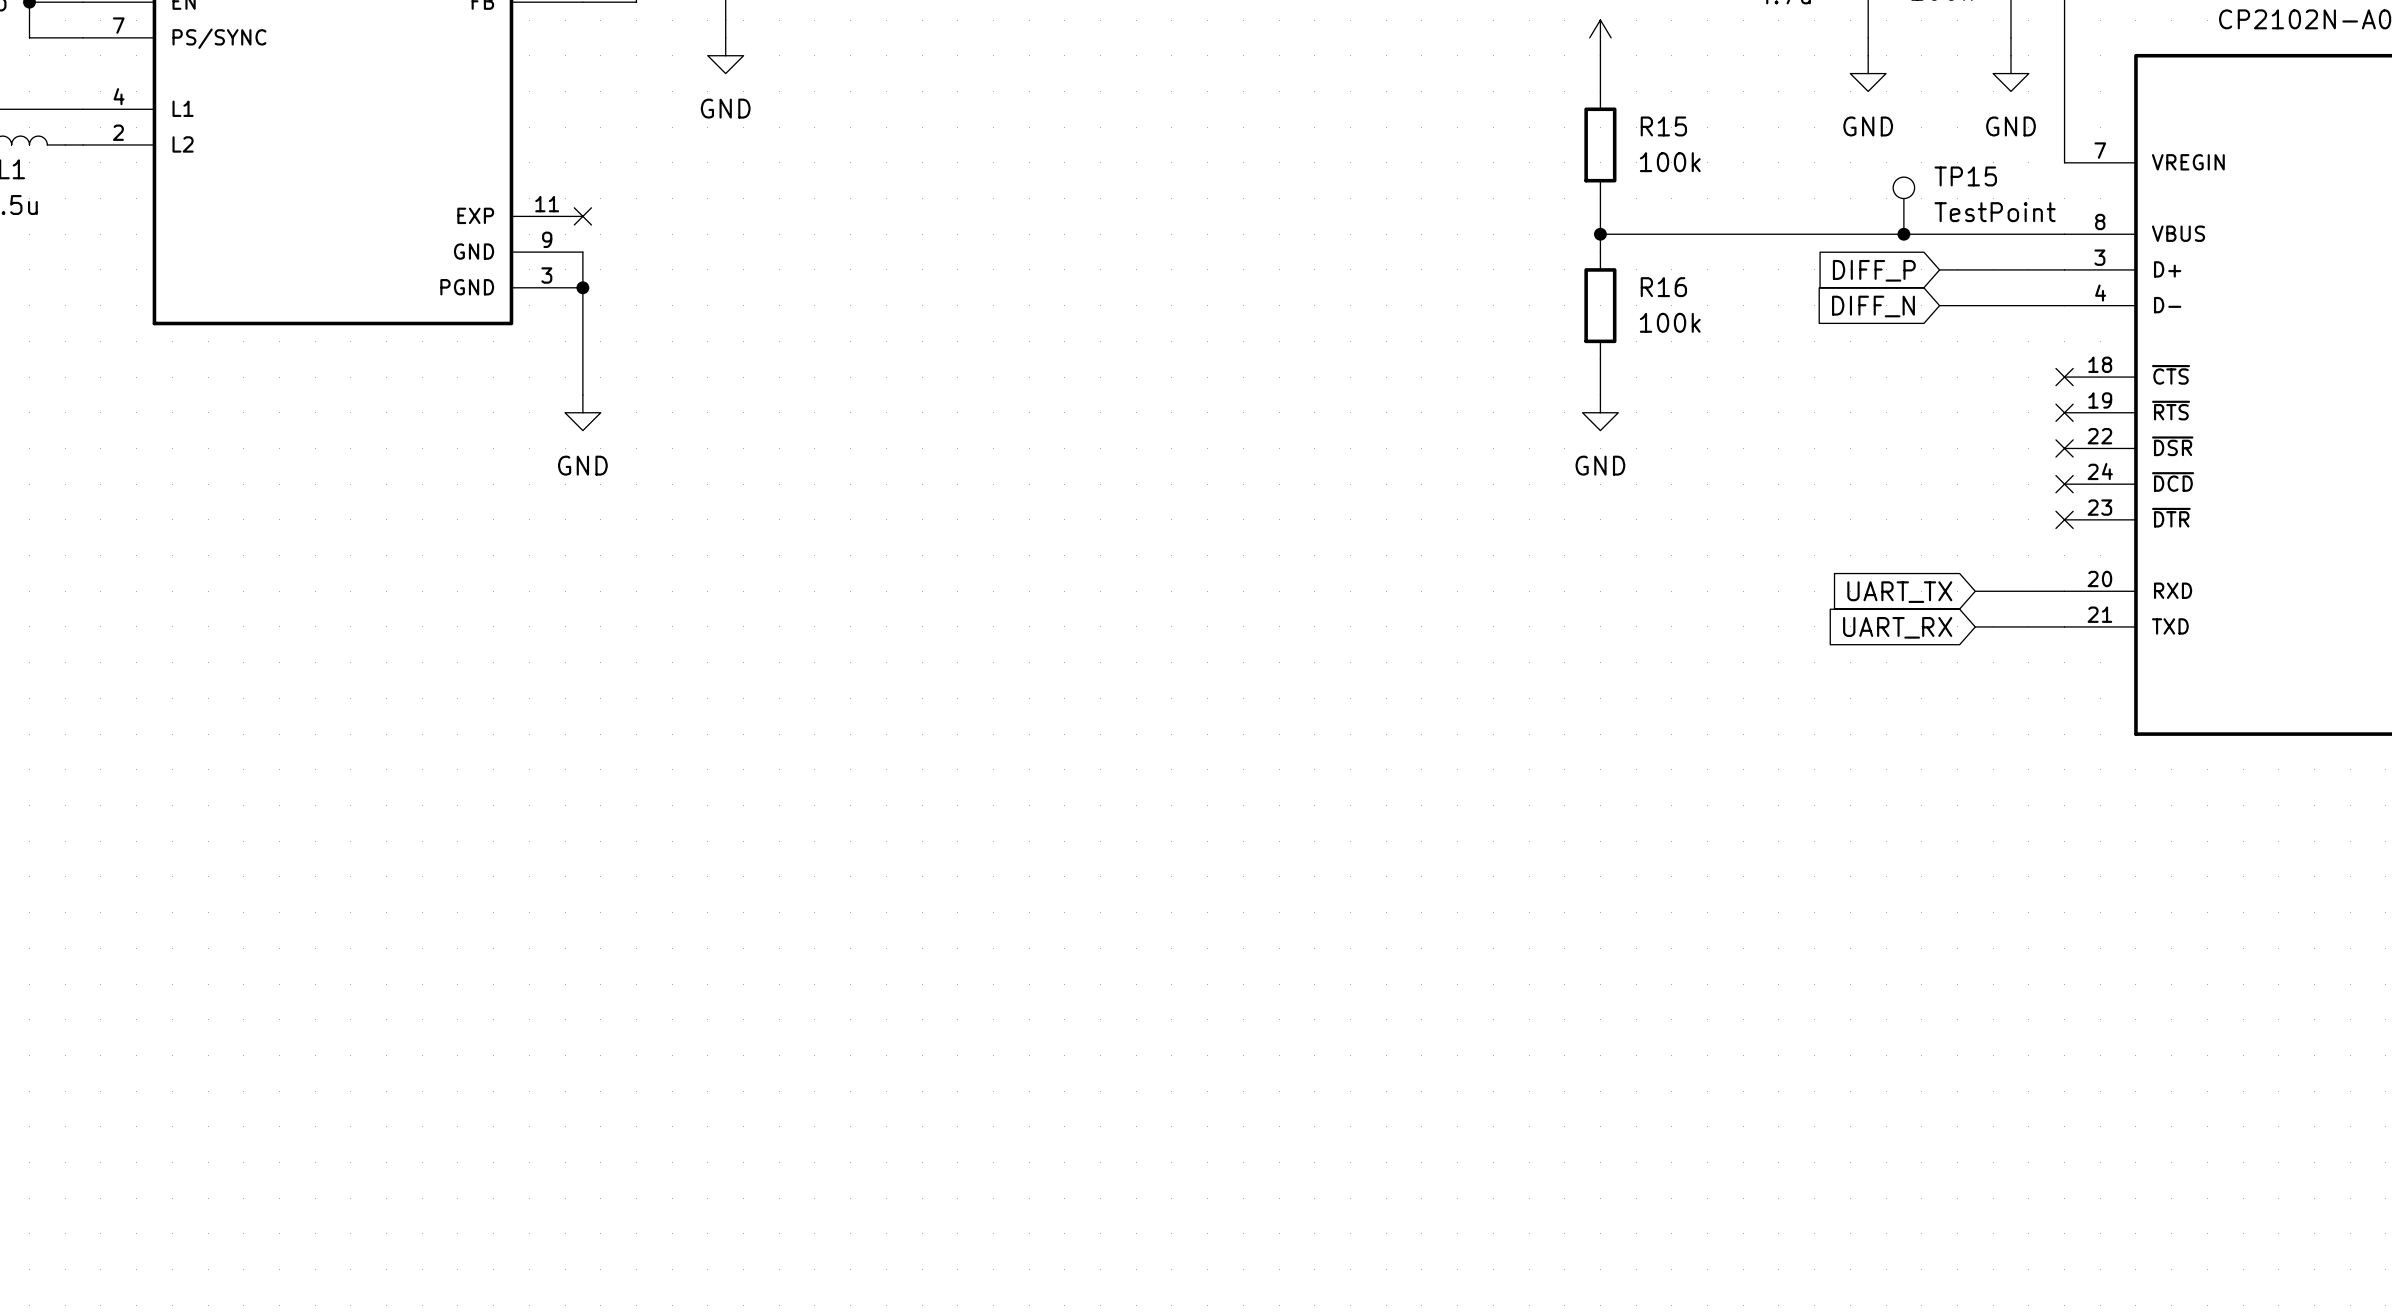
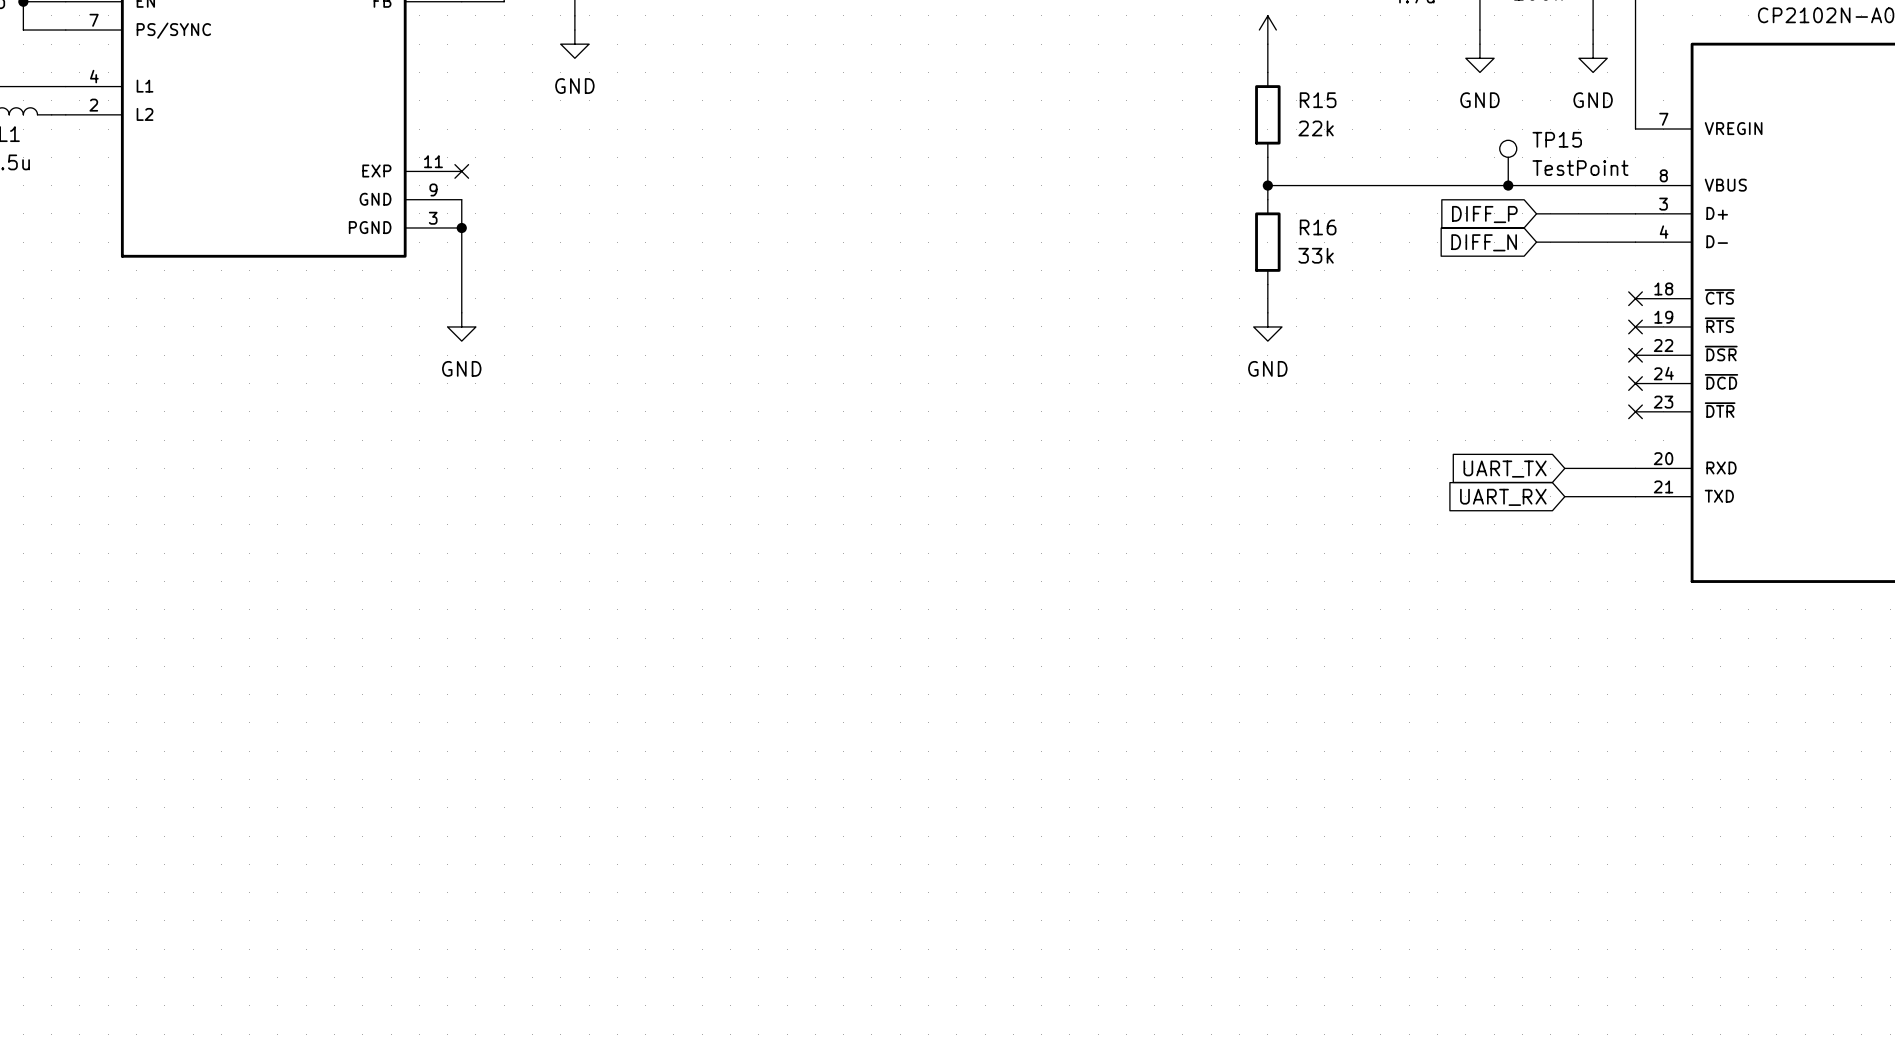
R15 value: 100k (1670, 162) -> 22k (1316, 128)
R16 value: 100k (1670, 322) -> 33k (1316, 255)

